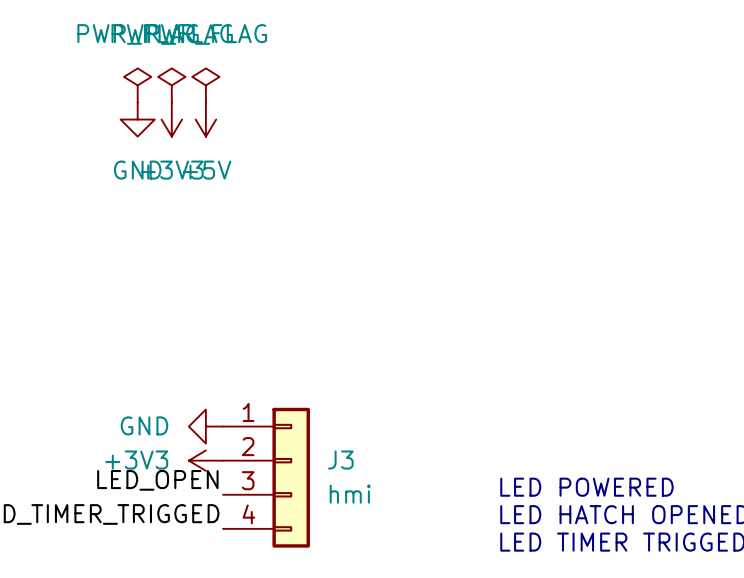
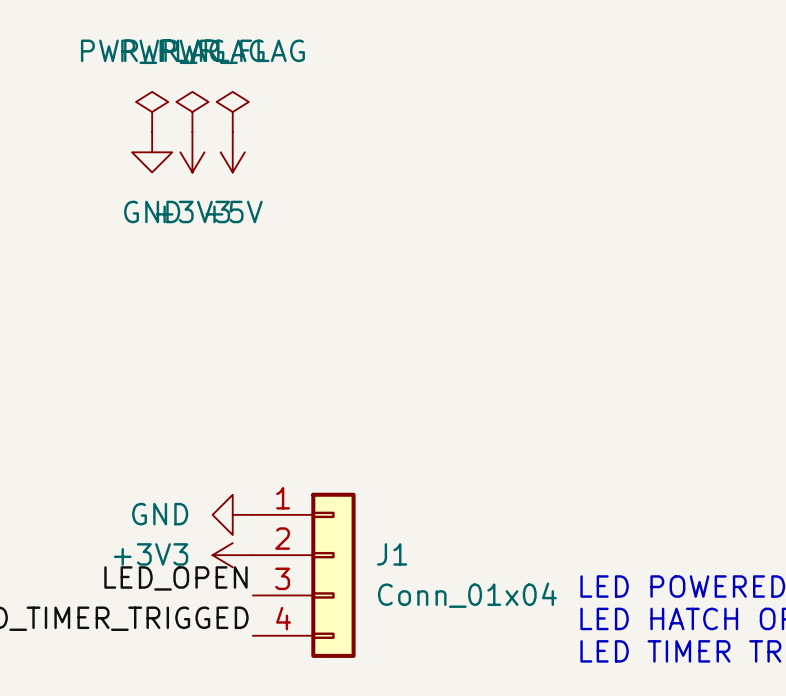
J3 name: J3 (340, 460) -> J1 (392, 554)
J3 value: hmi (350, 494) -> Conn_01x04 (467, 595)

